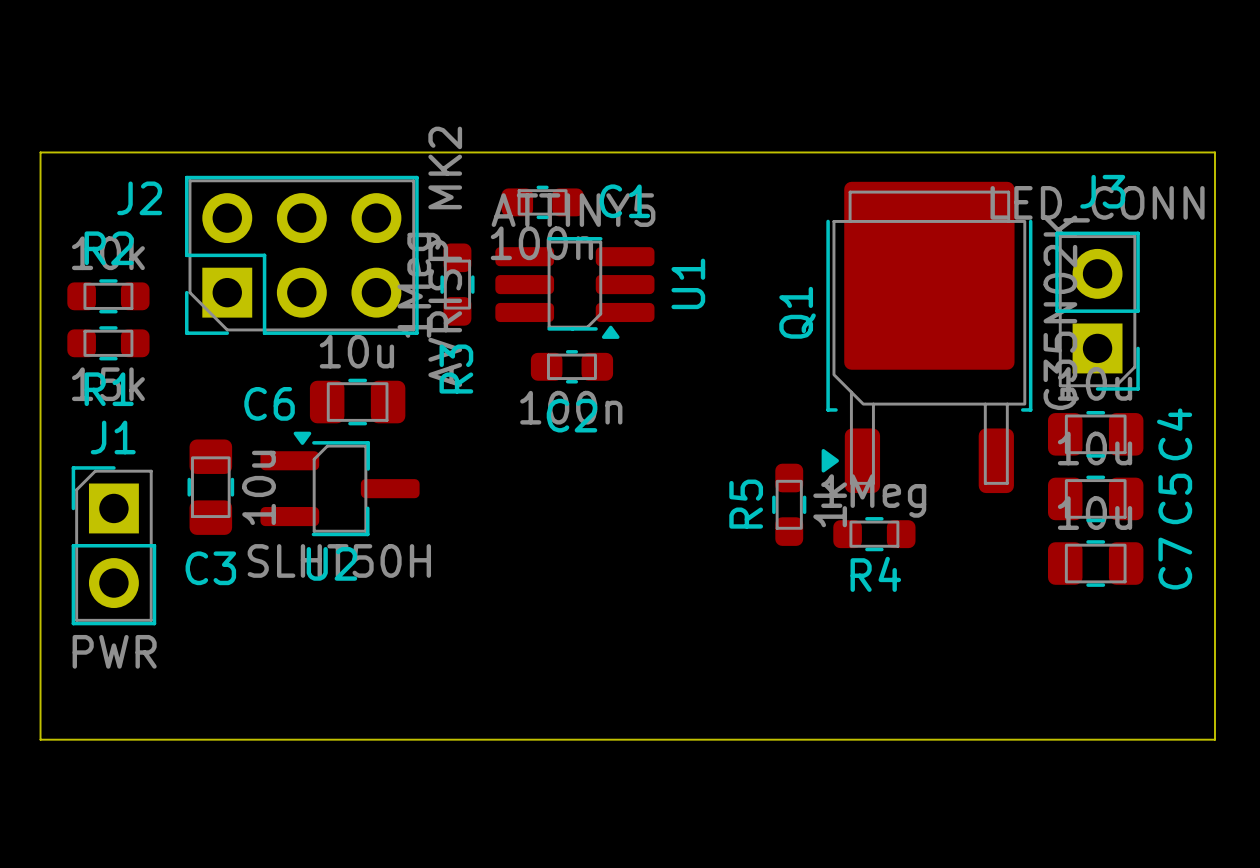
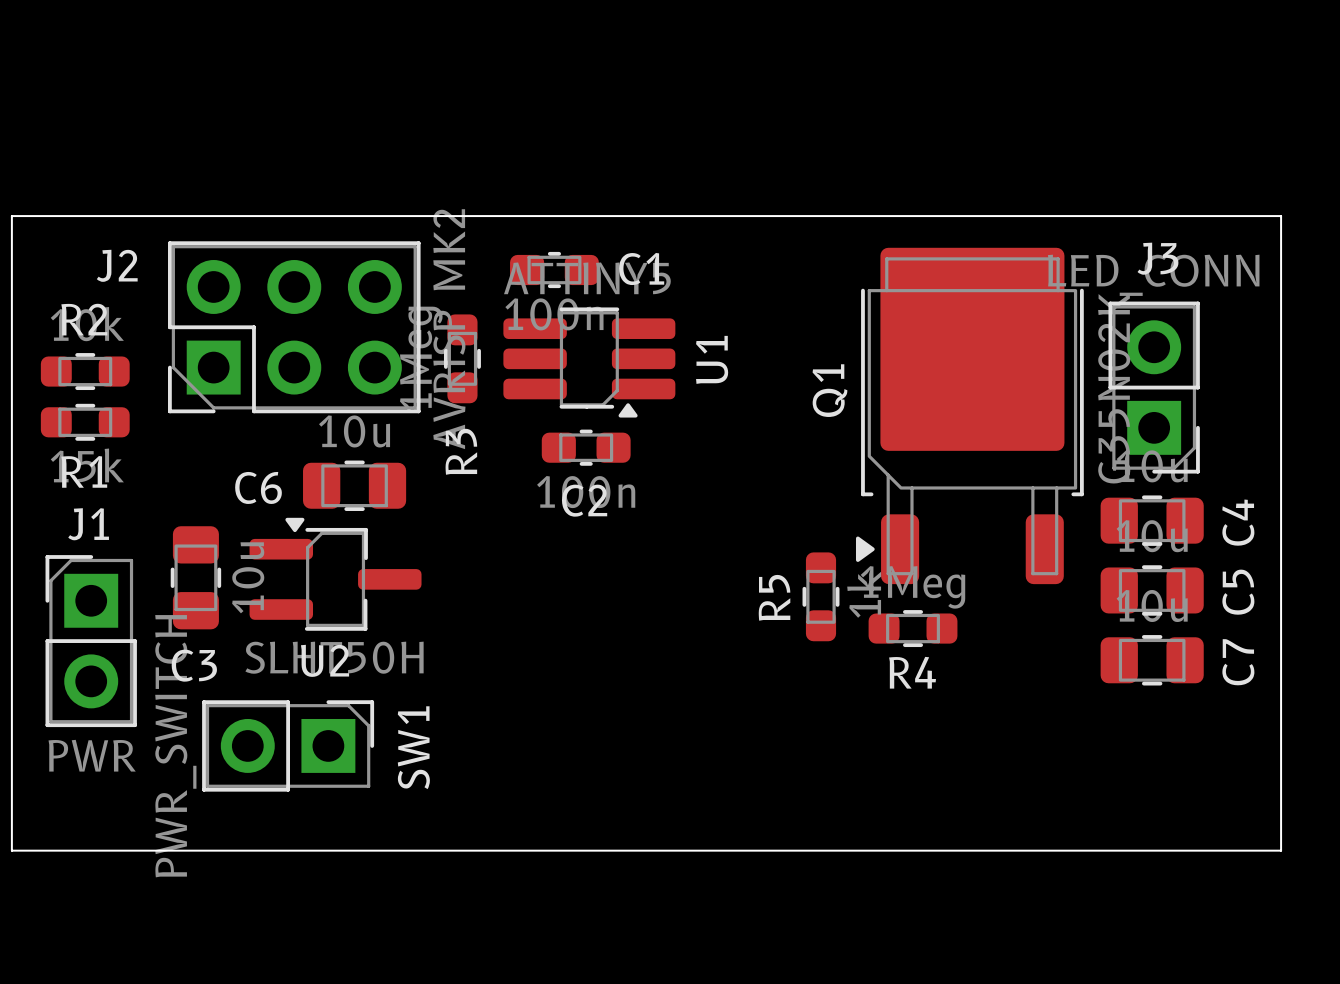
SW1: none -> PWR_SWITCH (288, 745)

